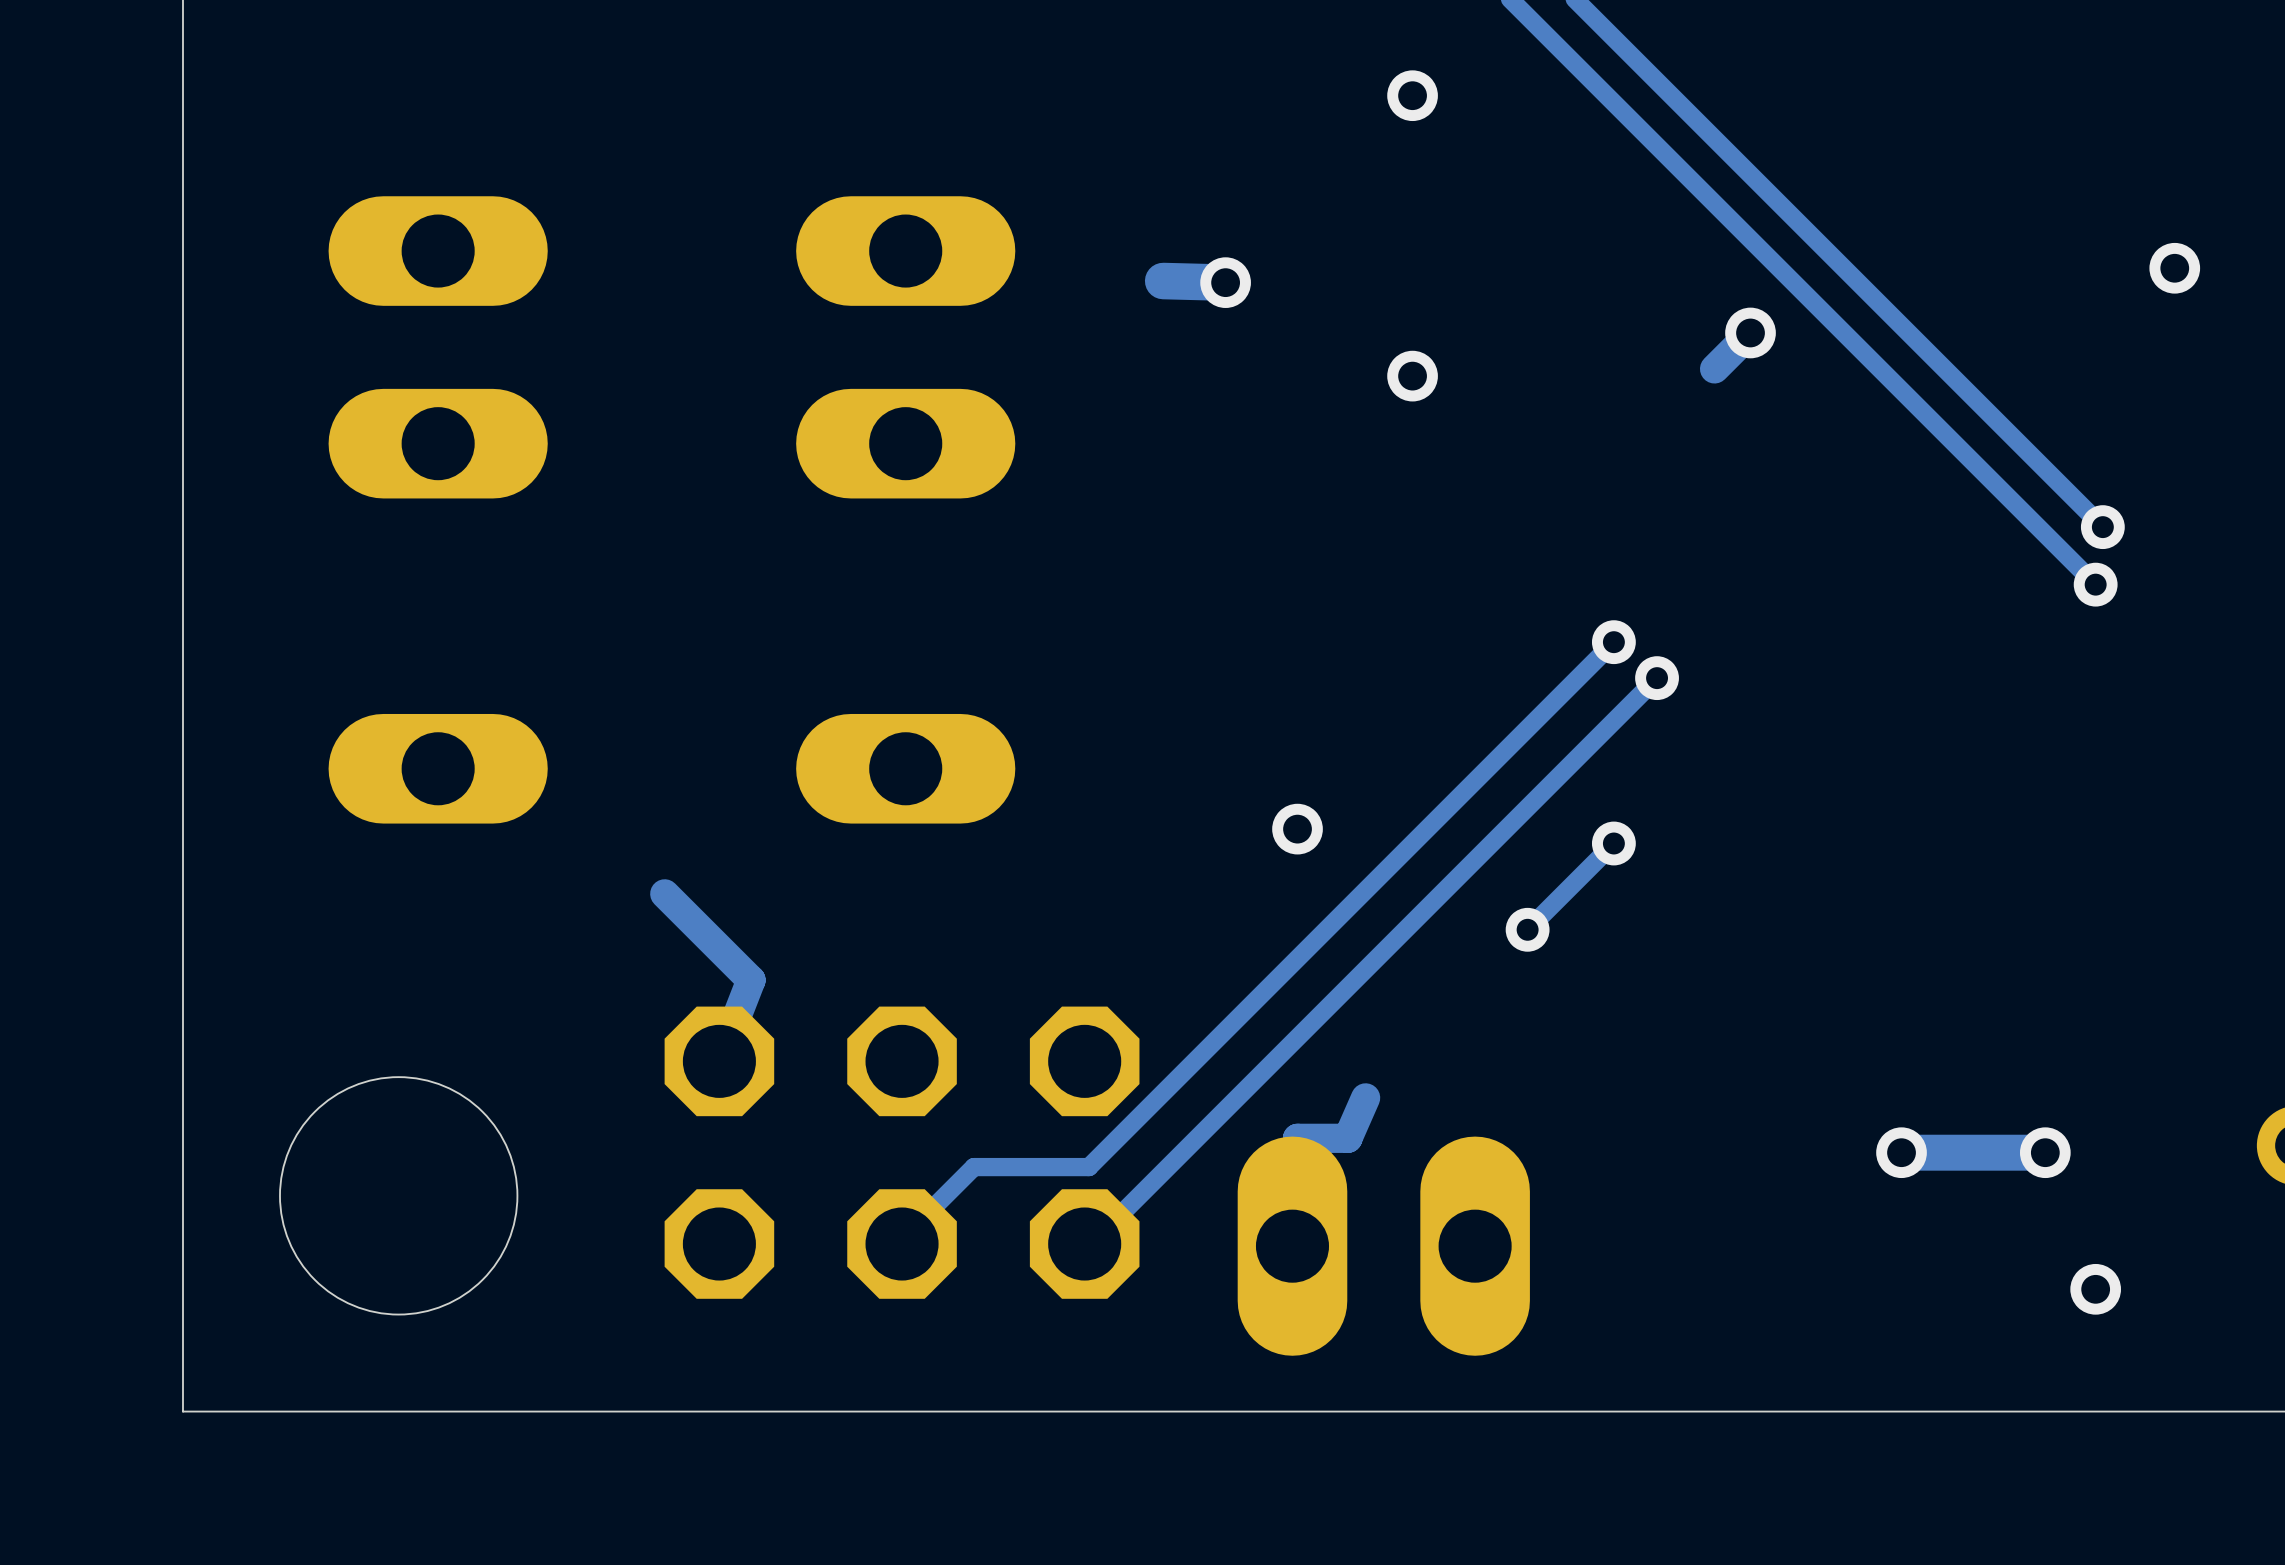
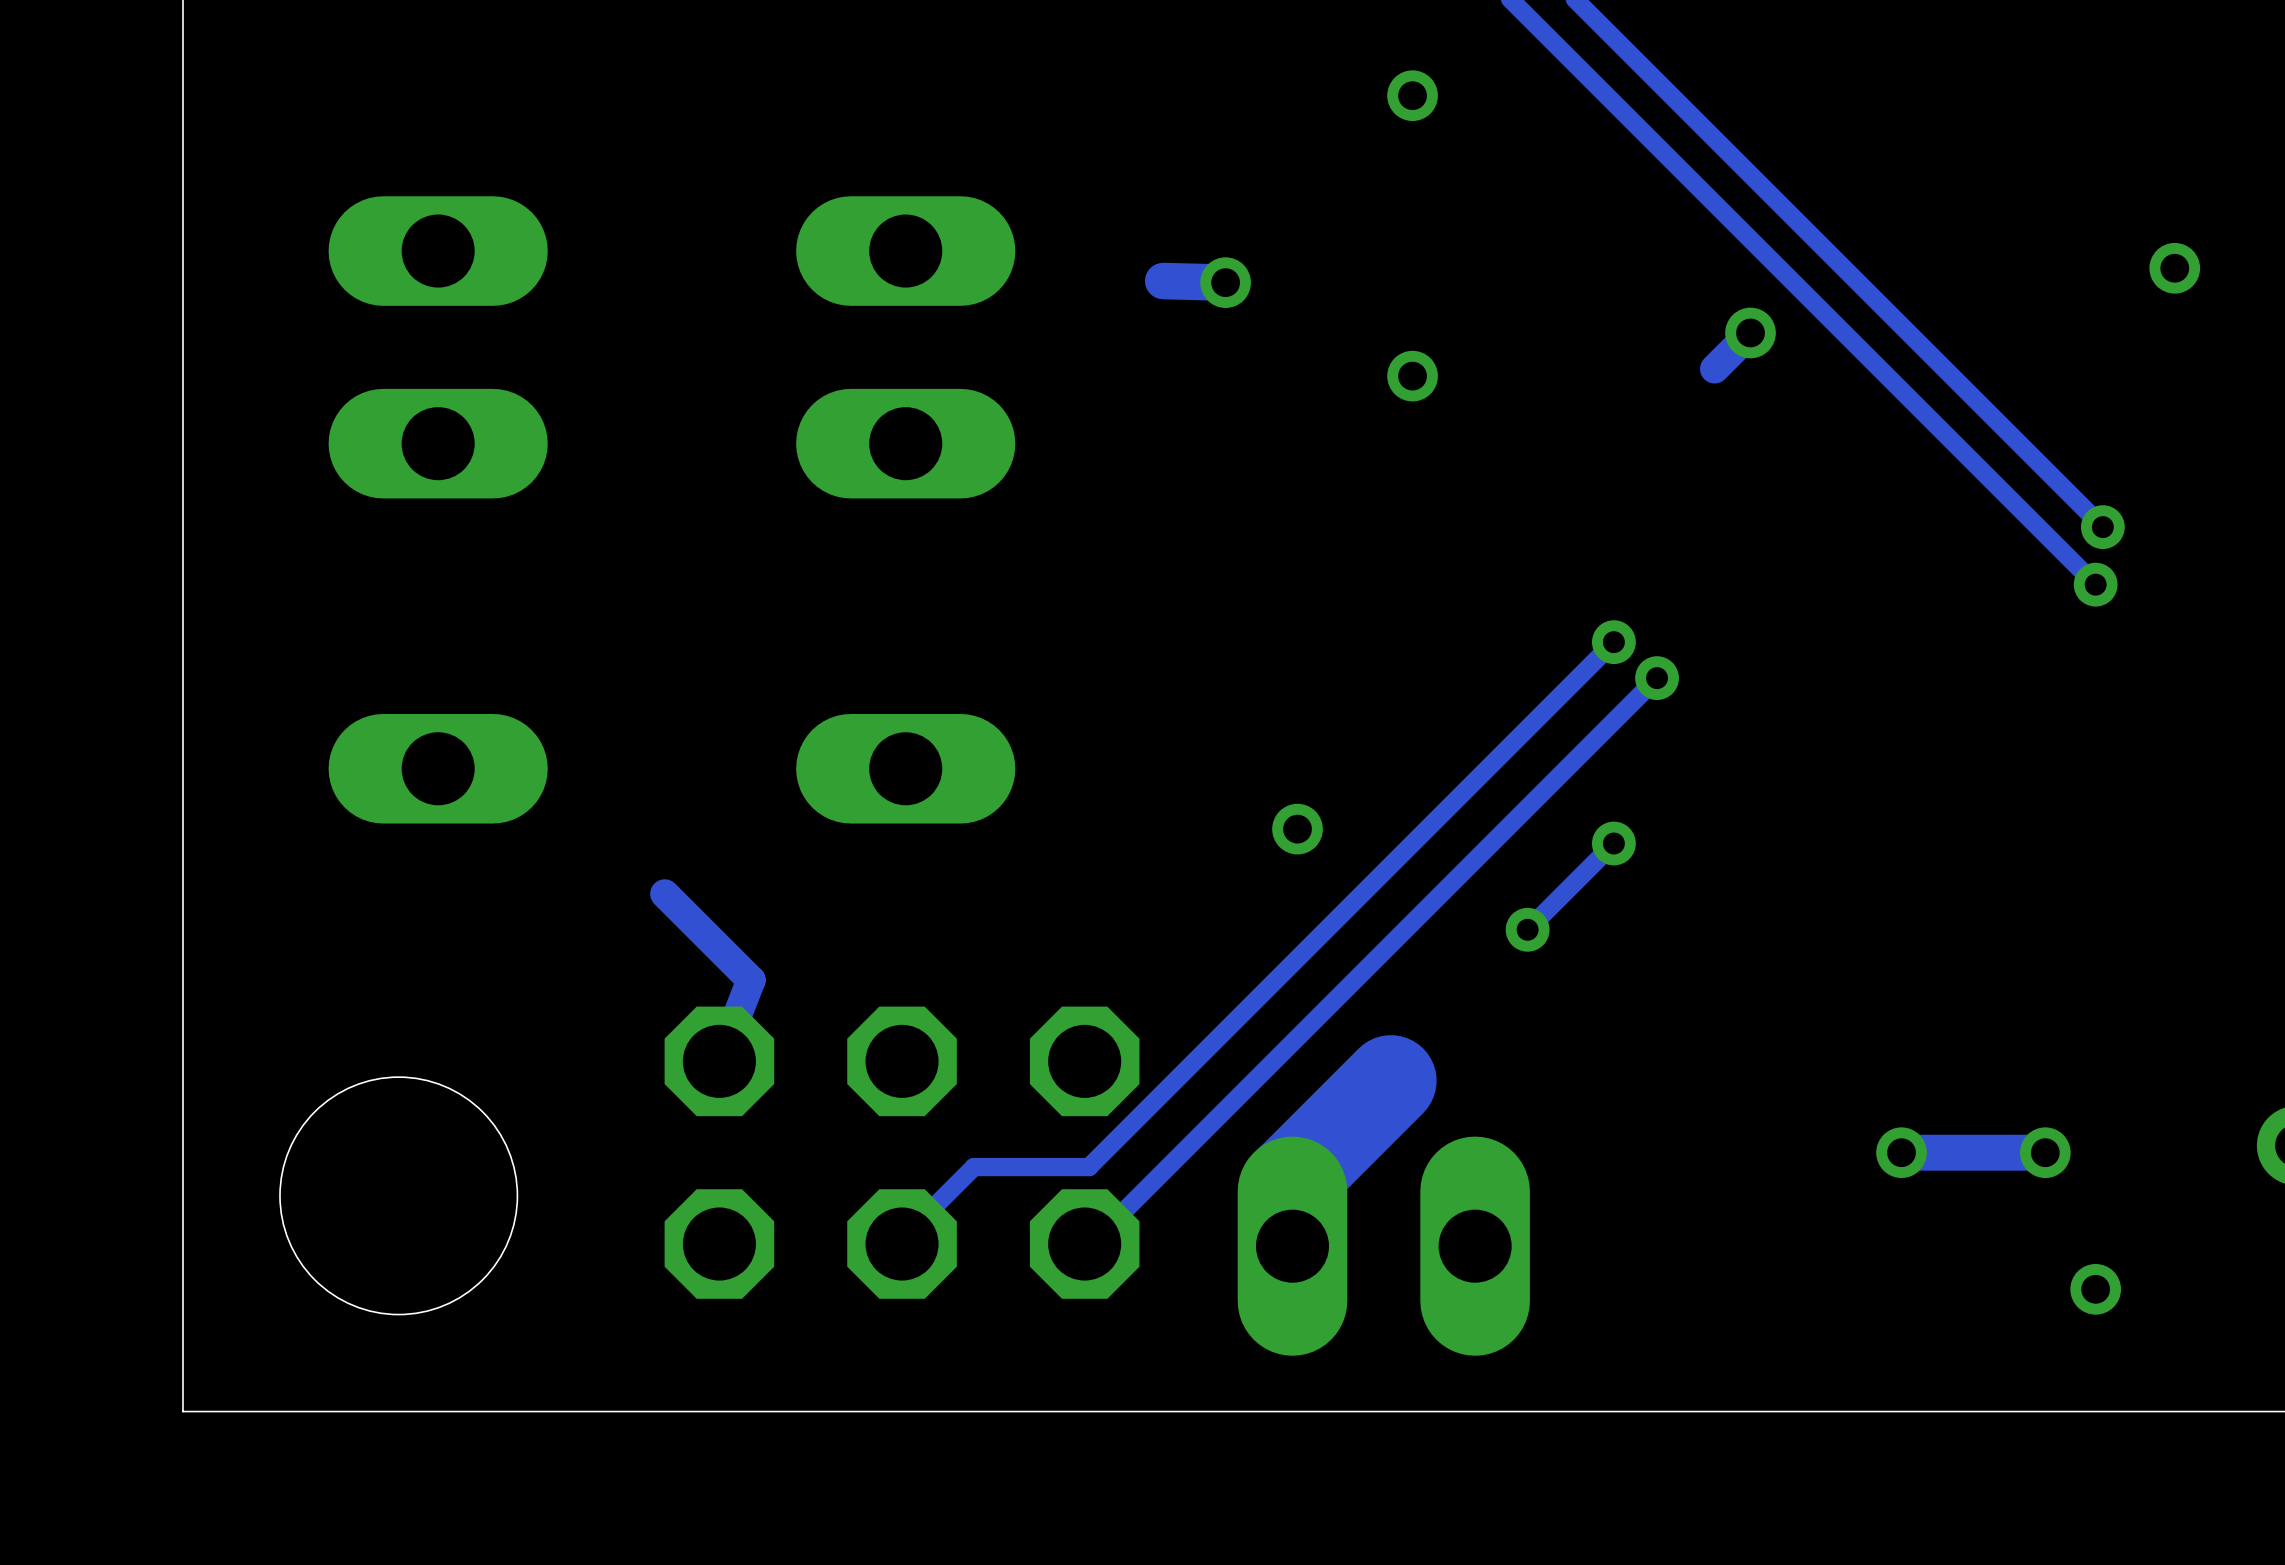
track: (1365, 1097) (1347, 1138) (1297, 1138) (1297, 1246) (1292, 1246) -> (1390, 1080) (1292, 1179) (1292, 1246)

